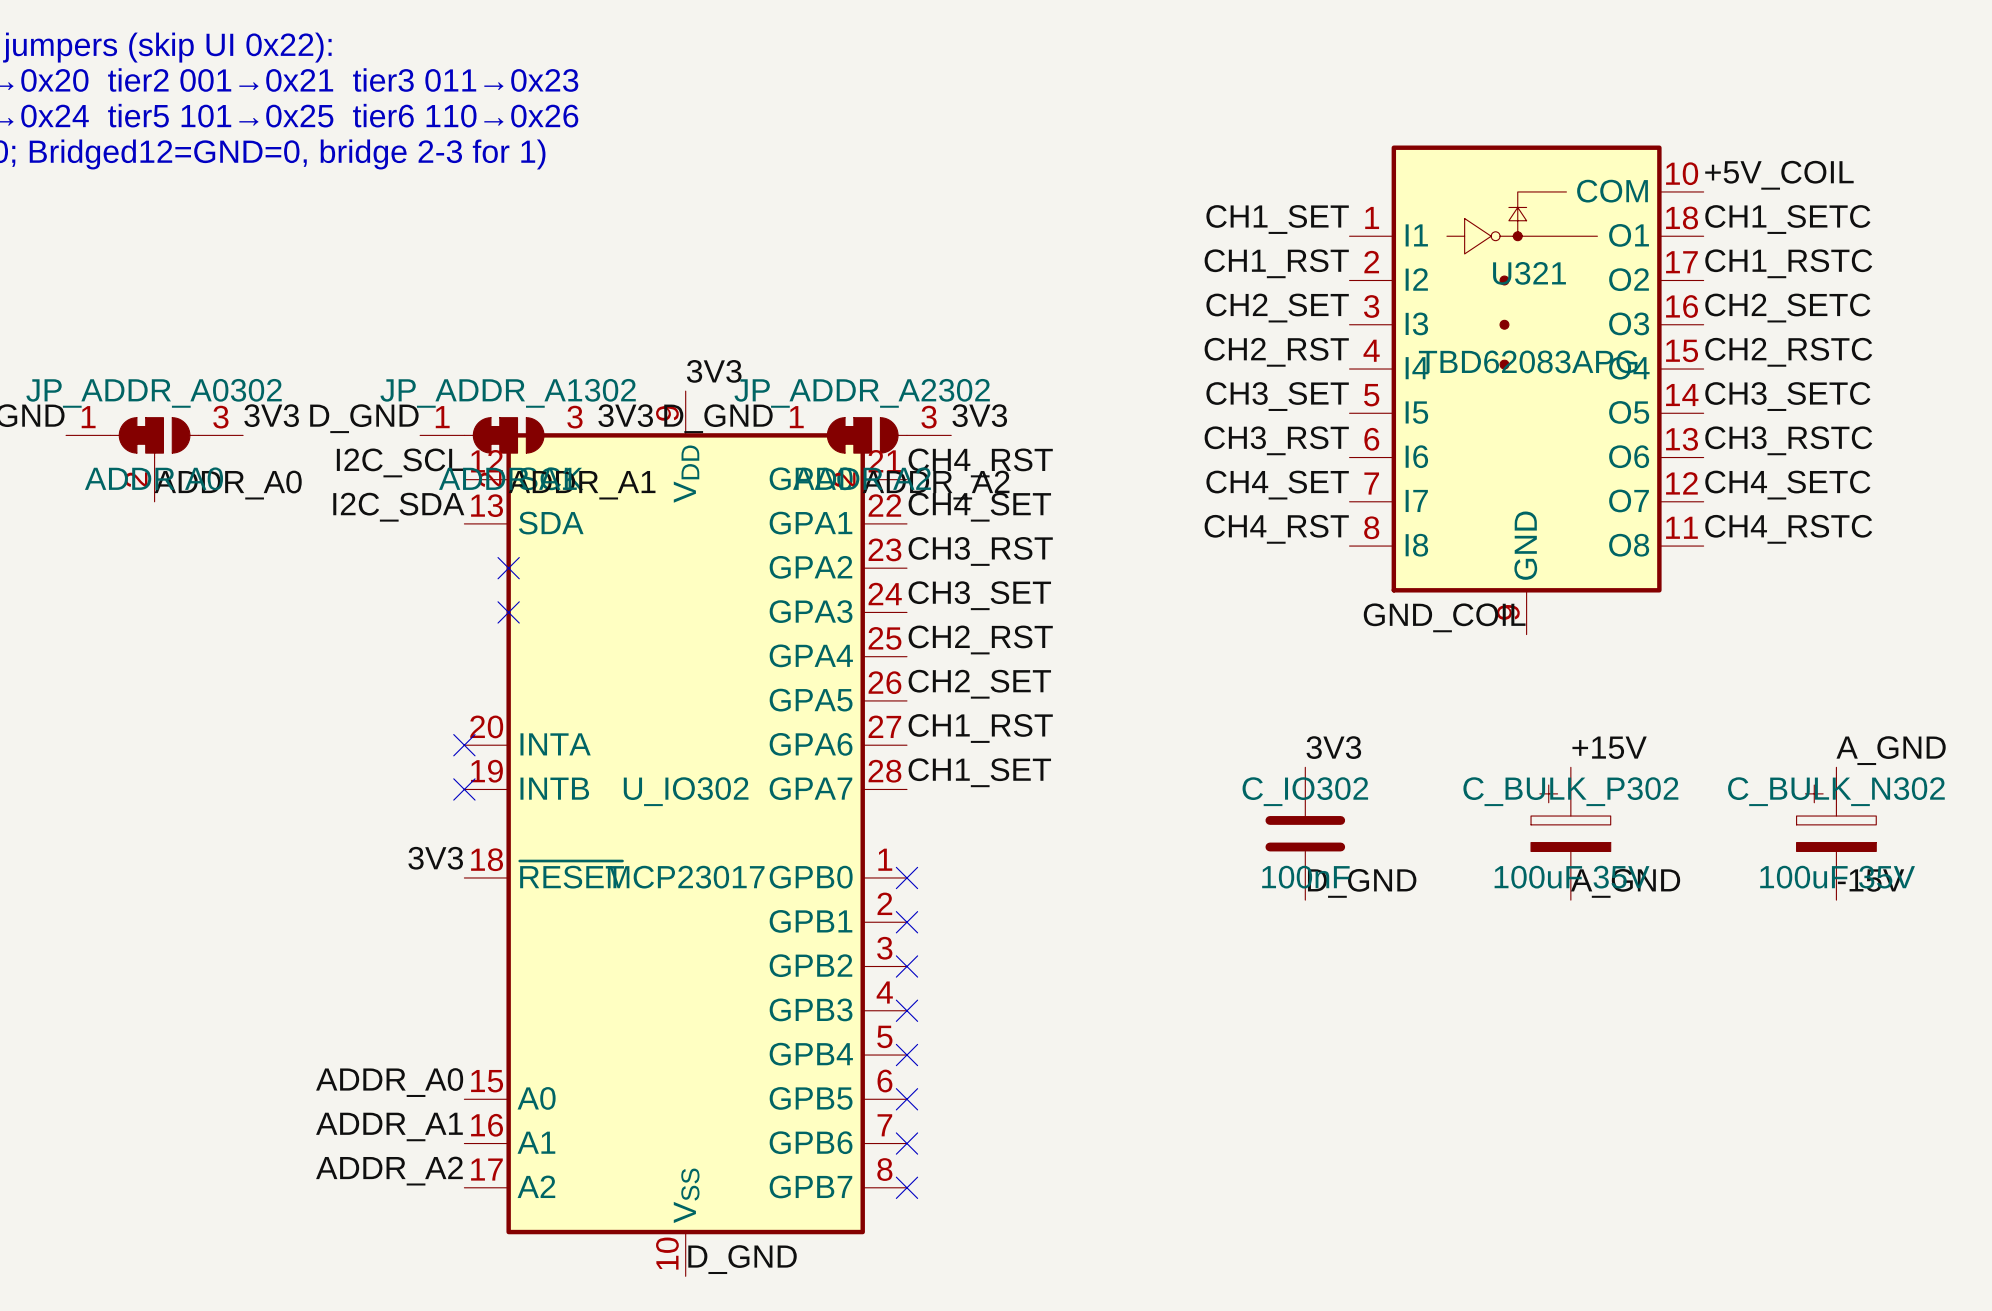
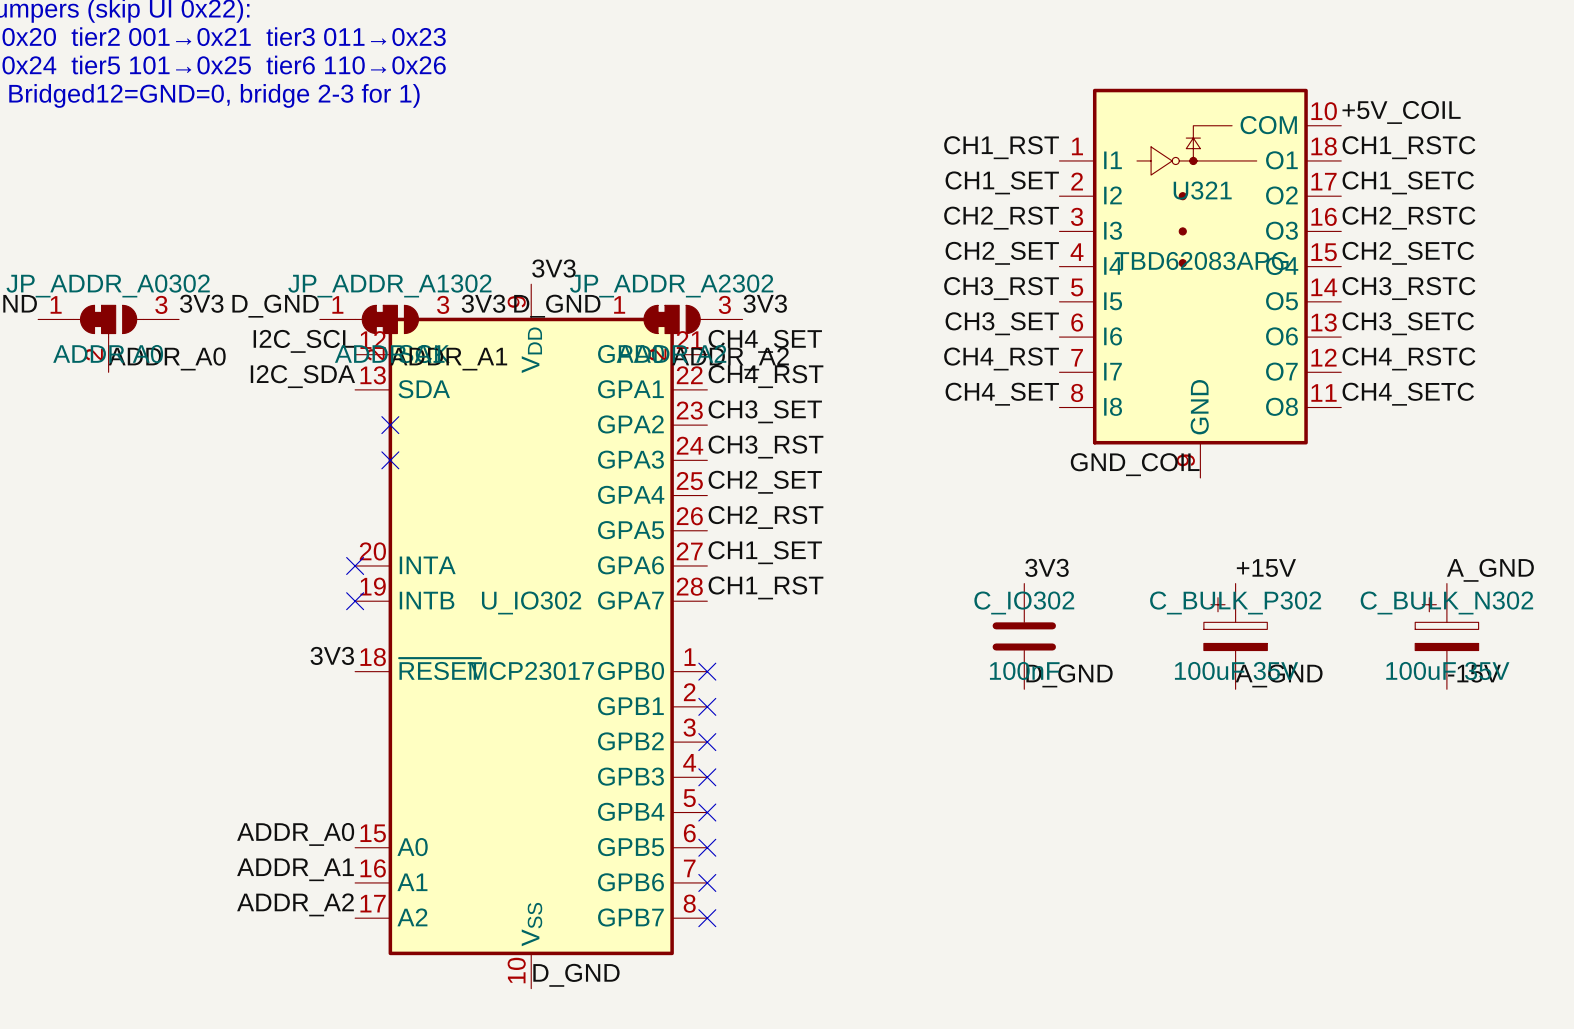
label: CH1_SET (1277, 219) -> CH1_RST (1001, 147)
label: CH1_SETC (1787, 219) -> CH1_RSTC (1408, 147)
label: CH1_RST (1276, 263) -> CH1_SET (1002, 182)
label: CH1_RSTC (1788, 263) -> CH1_SETC (1408, 182)
label: CH2_SET (1277, 308) -> CH2_RST (1001, 218)
label: CH2_SETC (1787, 308) -> CH2_RSTC (1408, 218)
label: CH2_RST (1276, 352) -> CH2_SET (1002, 253)
label: CH2_RSTC (1788, 352) -> CH2_SETC (1408, 253)
label: CH3_SET (1277, 396) -> CH3_RST (1001, 288)
label: CH3_SETC (1787, 396) -> CH3_RSTC (1408, 288)
label: CH3_RST (1276, 440) -> CH3_SET (1002, 323)
label: CH3_RSTC (1788, 440) -> CH3_SETC (1408, 323)
label: CH4_RST (980, 462) -> CH4_SET (765, 341)
label: CH4_SET (1277, 485) -> CH4_RST (1001, 358)
label: CH4_SETC (1787, 485) -> CH4_RSTC (1408, 358)
label: CH4_SET (979, 507) -> CH4_RST (765, 376)
label: CH4_RST (1276, 529) -> CH4_SET (1002, 394)
label: CH4_RSTC (1788, 529) -> CH4_SETC (1408, 394)
label: CH3_RST (980, 551) -> CH3_SET (765, 411)
label: CH3_SET (979, 595) -> CH3_RST (765, 447)
label: CH2_RST (980, 639) -> CH2_SET (765, 482)
label: CH2_SET (979, 684) -> CH2_RST (765, 517)
label: CH1_RST (980, 728) -> CH1_SET (765, 552)
label: CH1_SET (979, 772) -> CH1_RST (765, 587)

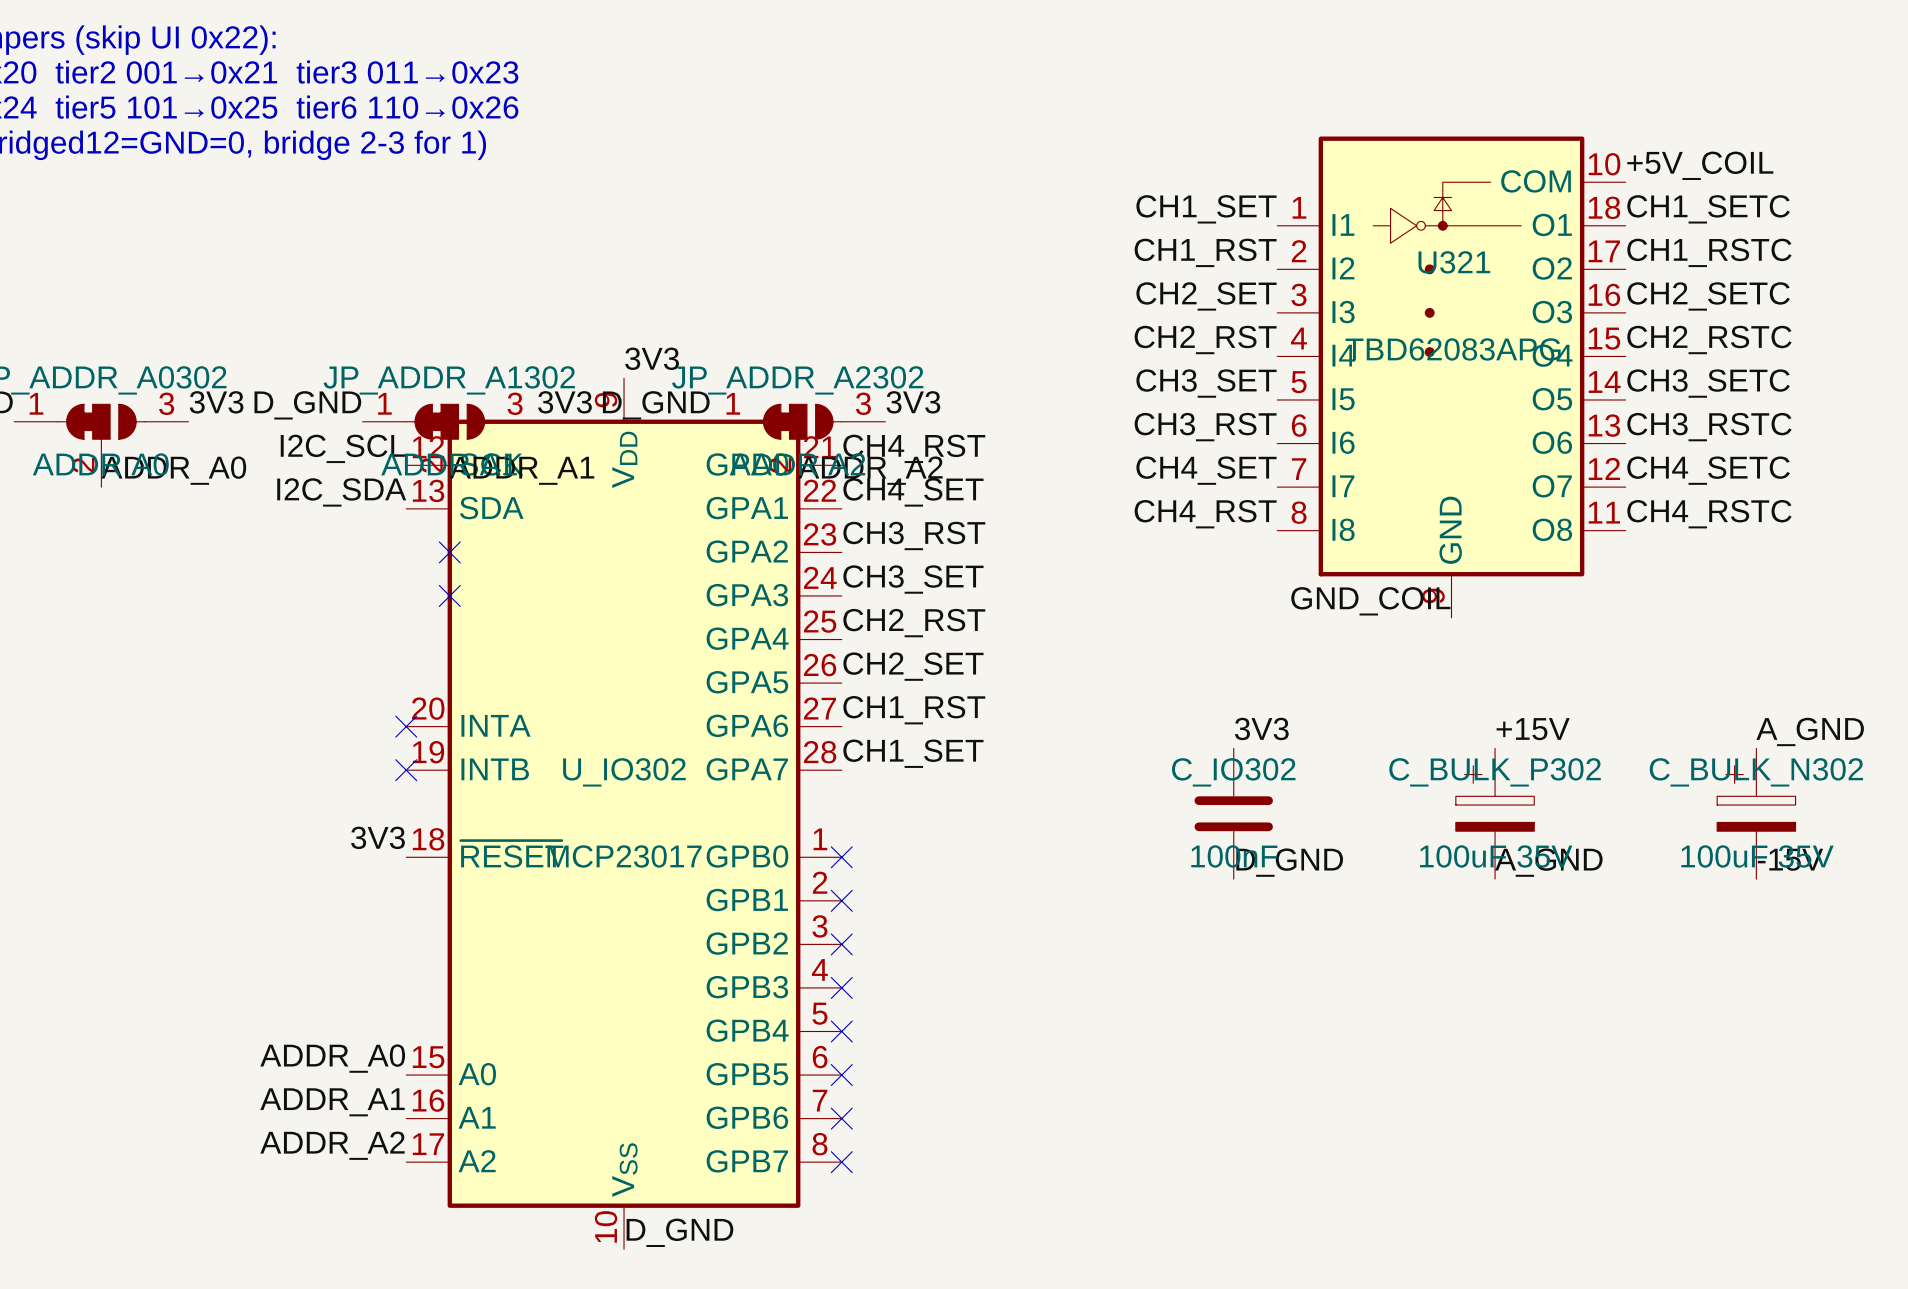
label: CH1_RST (1001, 147) -> CH1_SET (1206, 209)
label: CH1_RSTC (1408, 147) -> CH1_SETC (1708, 209)
label: CH1_SET (1002, 182) -> CH1_RST (1205, 252)
label: CH1_SETC (1408, 182) -> CH1_RSTC (1709, 252)
label: CH2_RST (1001, 218) -> CH2_SET (1206, 296)
label: CH2_RSTC (1408, 218) -> CH2_SETC (1708, 296)
label: CH2_SET (1002, 253) -> CH2_RST (1205, 339)
label: CH2_SETC (1408, 253) -> CH2_RSTC (1709, 339)
label: CH3_RST (1001, 288) -> CH3_SET (1206, 383)
label: CH3_RSTC (1408, 288) -> CH3_SETC (1708, 383)
label: CH3_SET (1002, 323) -> CH3_RST (1205, 427)
label: CH3_SETC (1408, 323) -> CH3_RSTC (1709, 427)
label: CH4_SET (765, 341) -> CH4_RST (914, 448)
label: CH4_RST (1001, 358) -> CH4_SET (1206, 470)
label: CH4_RSTC (1408, 358) -> CH4_SETC (1708, 470)
label: CH4_RST (765, 376) -> CH4_SET (913, 492)
label: CH4_SET (1002, 394) -> CH4_RST (1205, 514)
label: CH4_SETC (1408, 394) -> CH4_RSTC (1709, 514)
label: CH3_SET (765, 411) -> CH3_RST (914, 535)
label: CH3_RST (765, 447) -> CH3_SET (913, 579)
label: CH2_SET (765, 482) -> CH2_RST (914, 623)
label: CH2_RST (765, 517) -> CH2_SET (913, 666)
label: CH1_SET (765, 552) -> CH1_RST (914, 710)
label: CH1_RST (765, 587) -> CH1_SET (913, 753)

